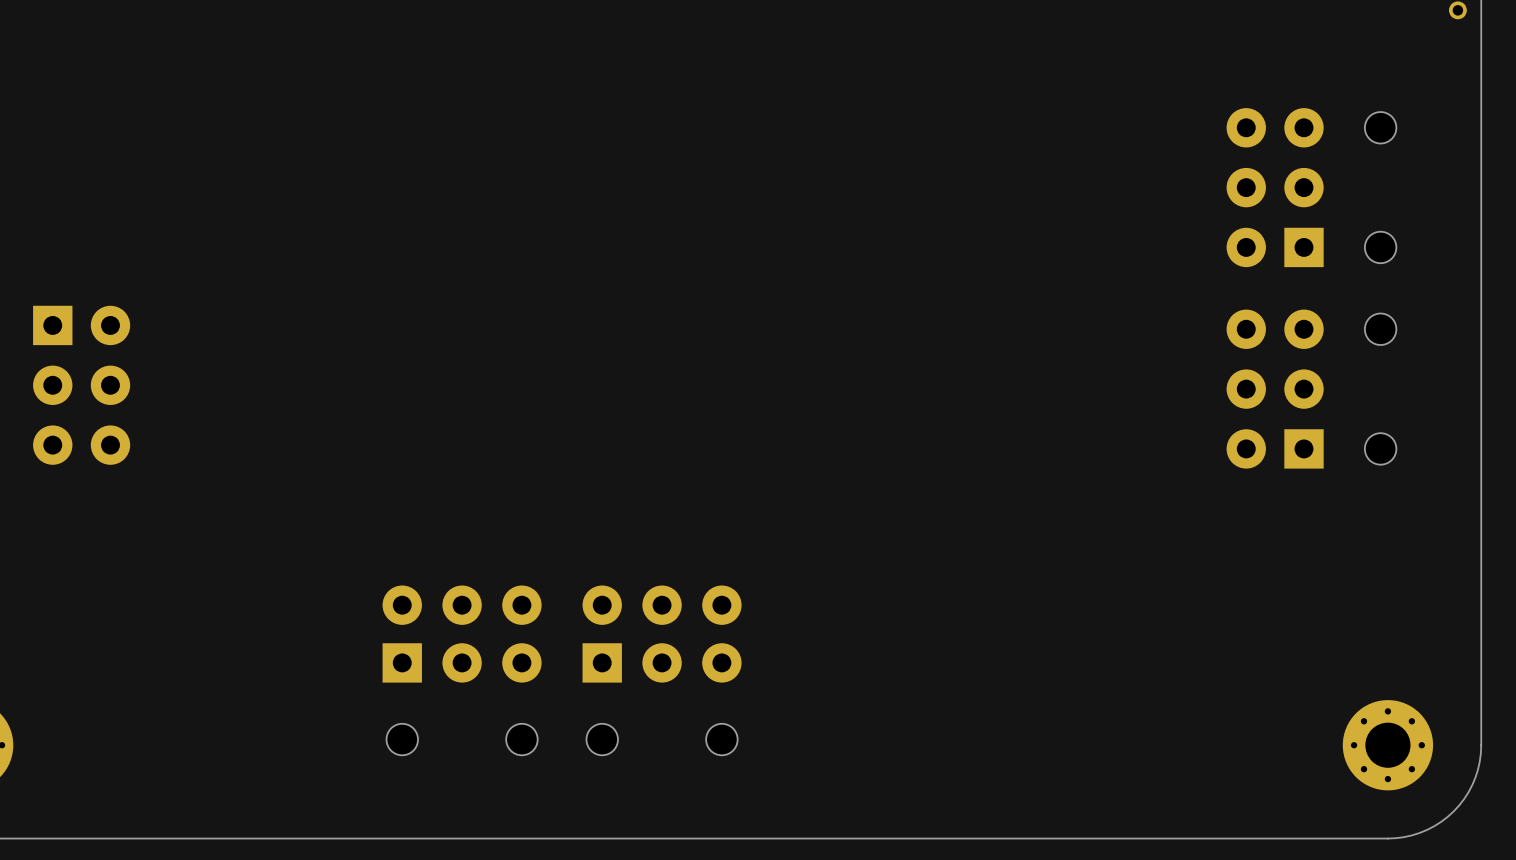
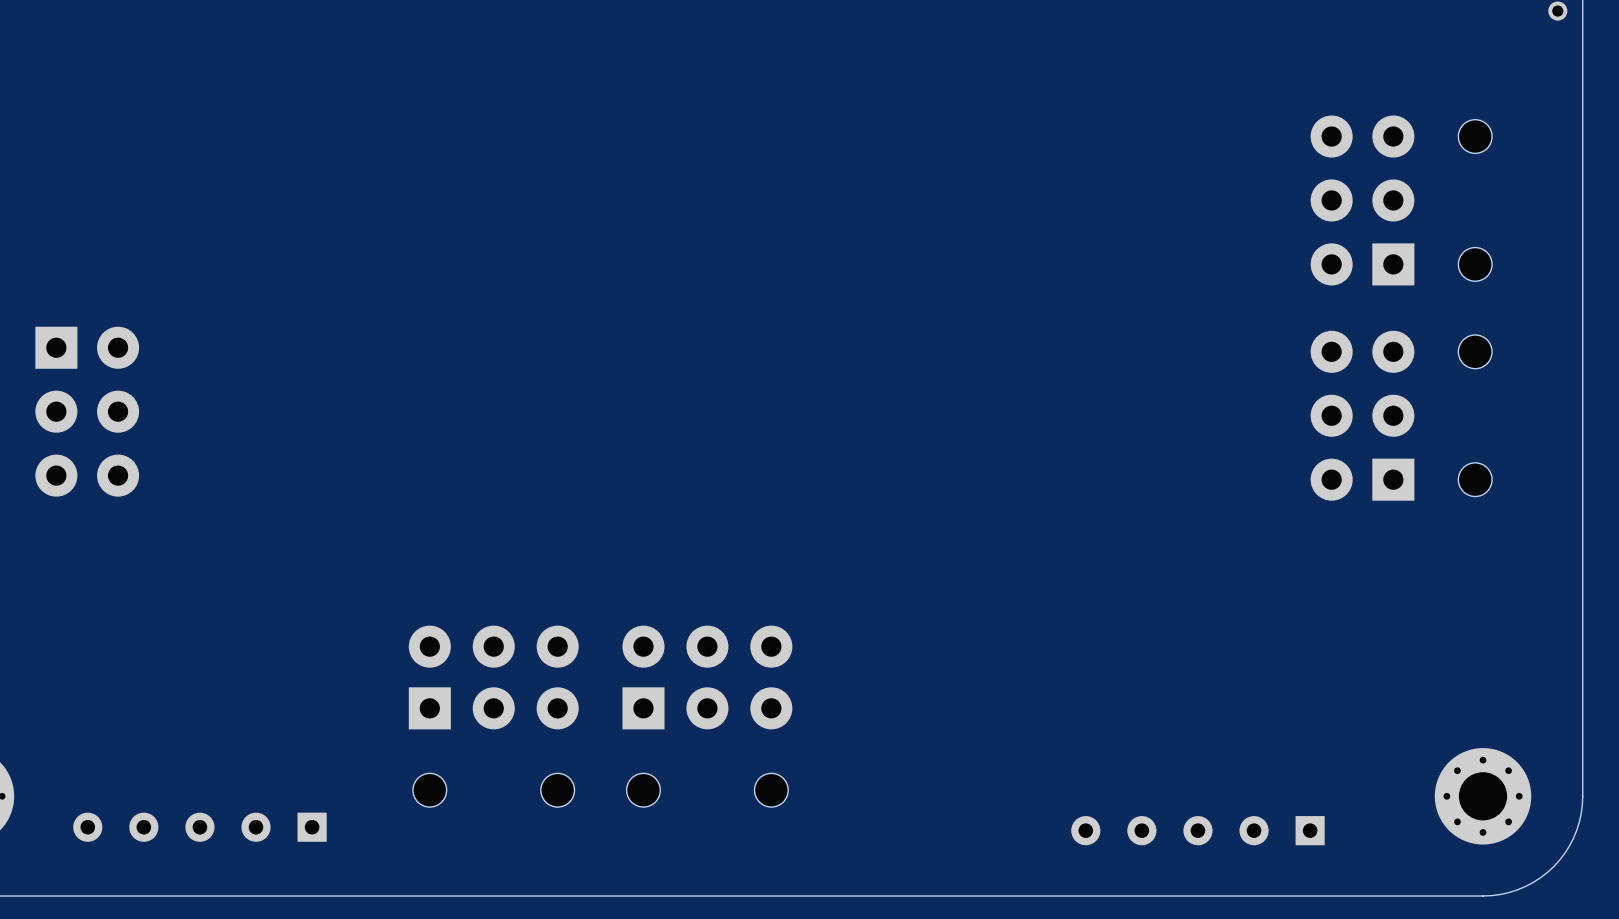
part: none -> (199, 827)
part: none -> (1197, 830)

